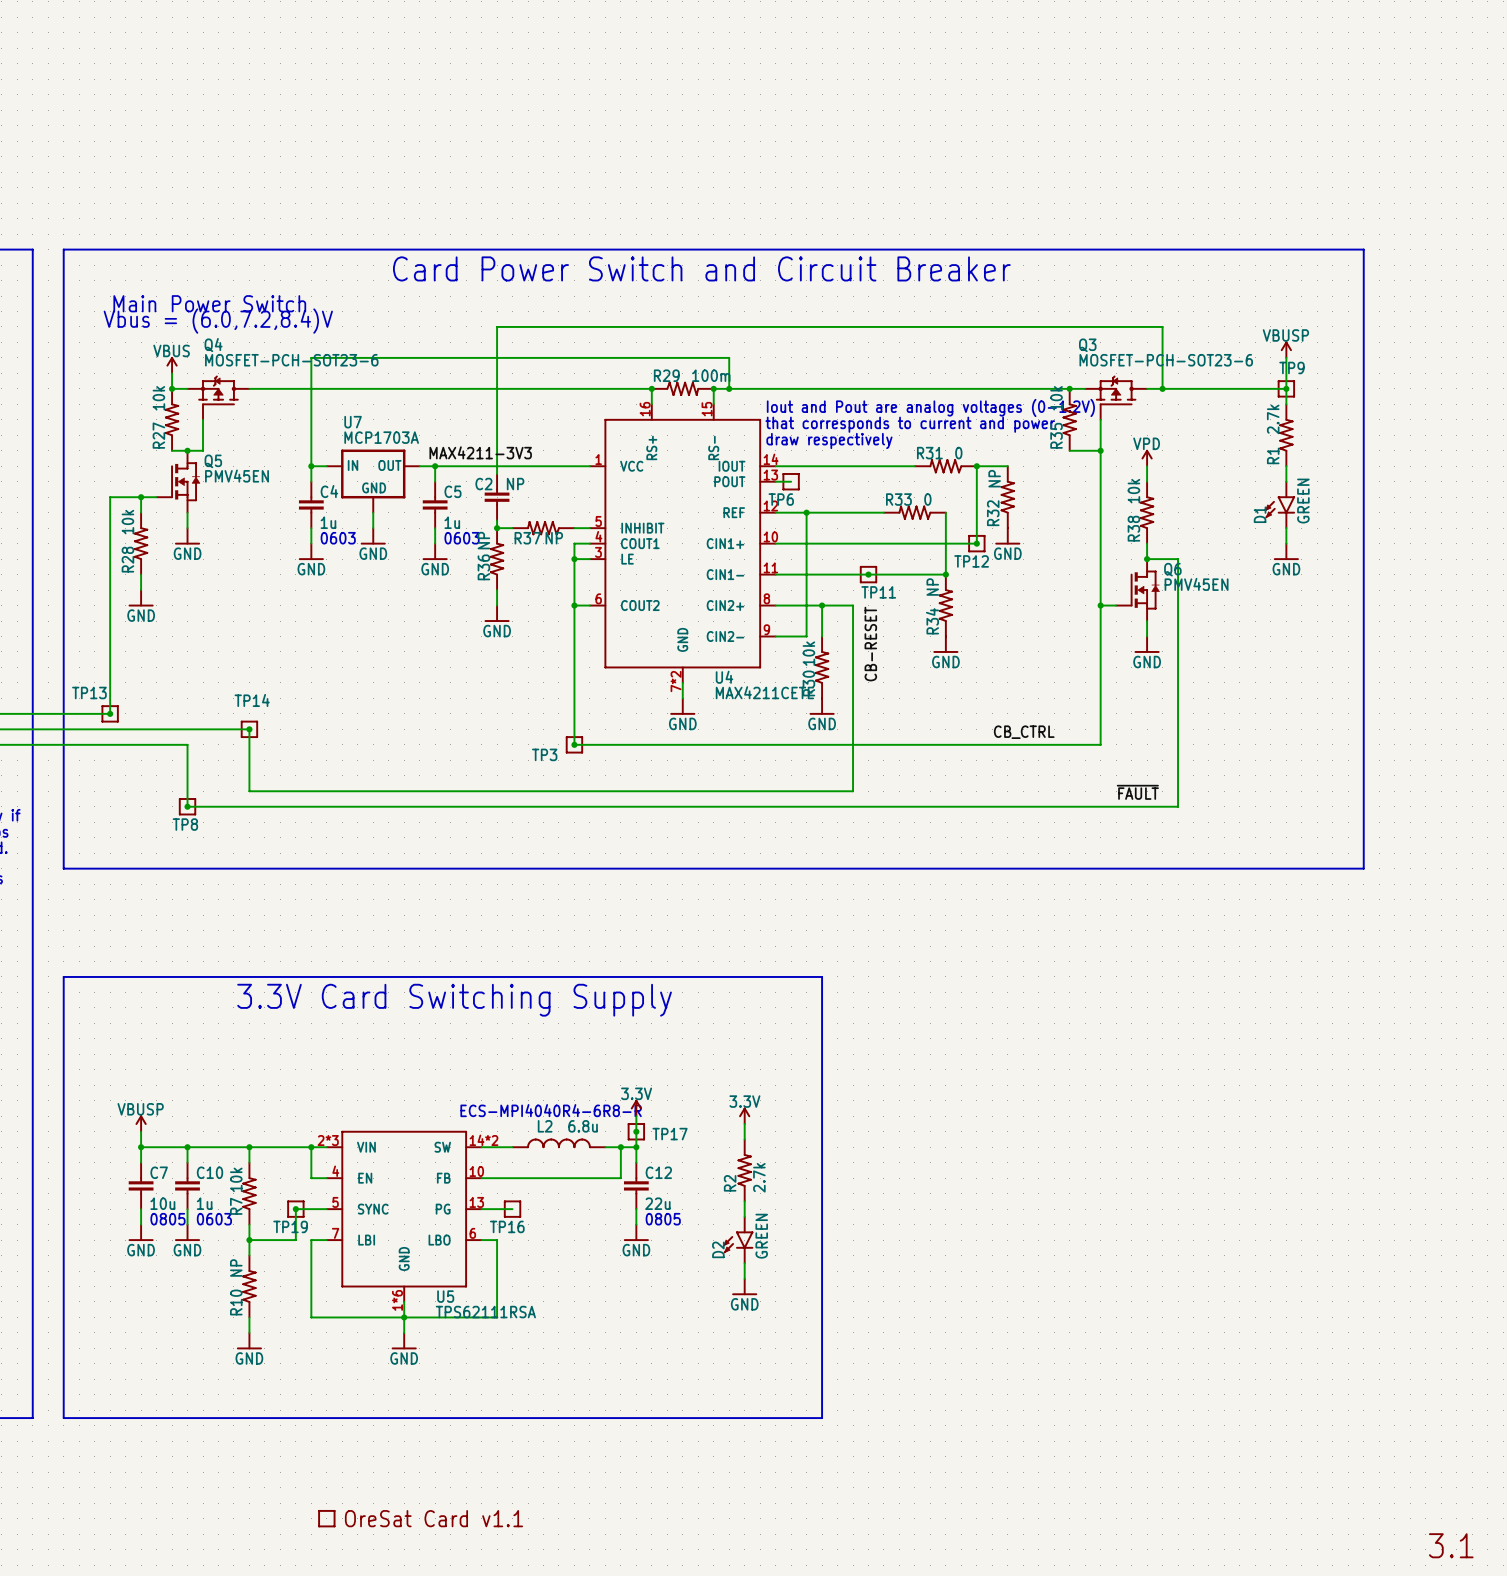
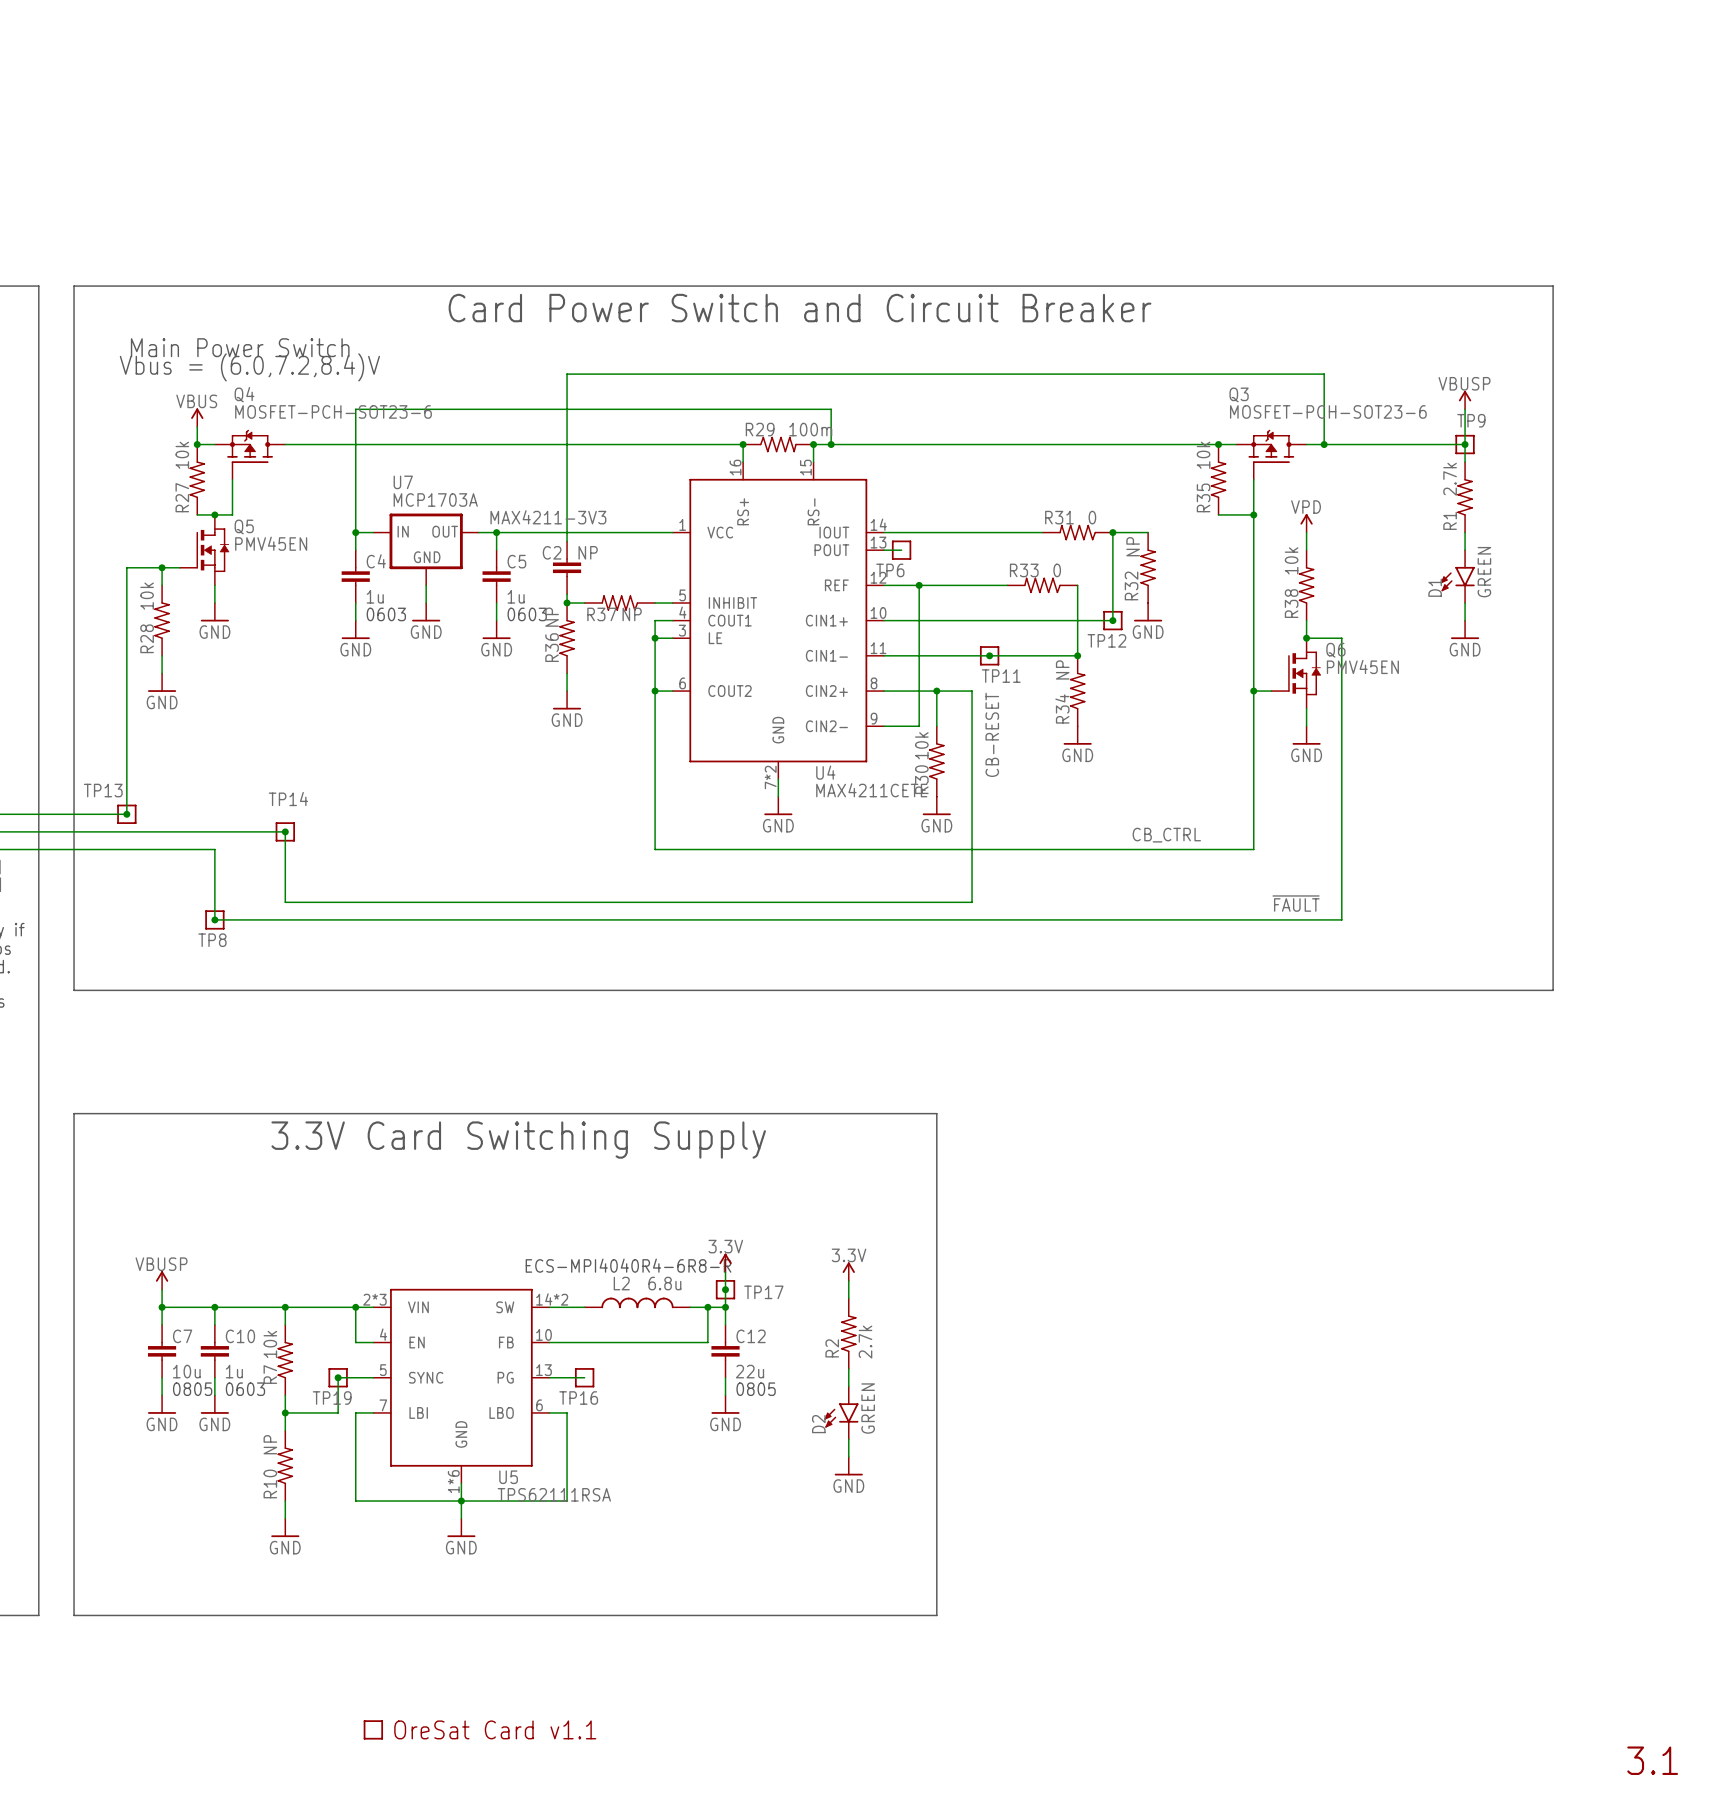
text: Iout and Pout are analog voltages (0-1.2V) (930, 407) -> none
text: that corresponds to current and power (910, 424) -> none
text: draw respectively (829, 440) -> none
TP3: (574, 744) -> none
junction: (574, 744) -> none

